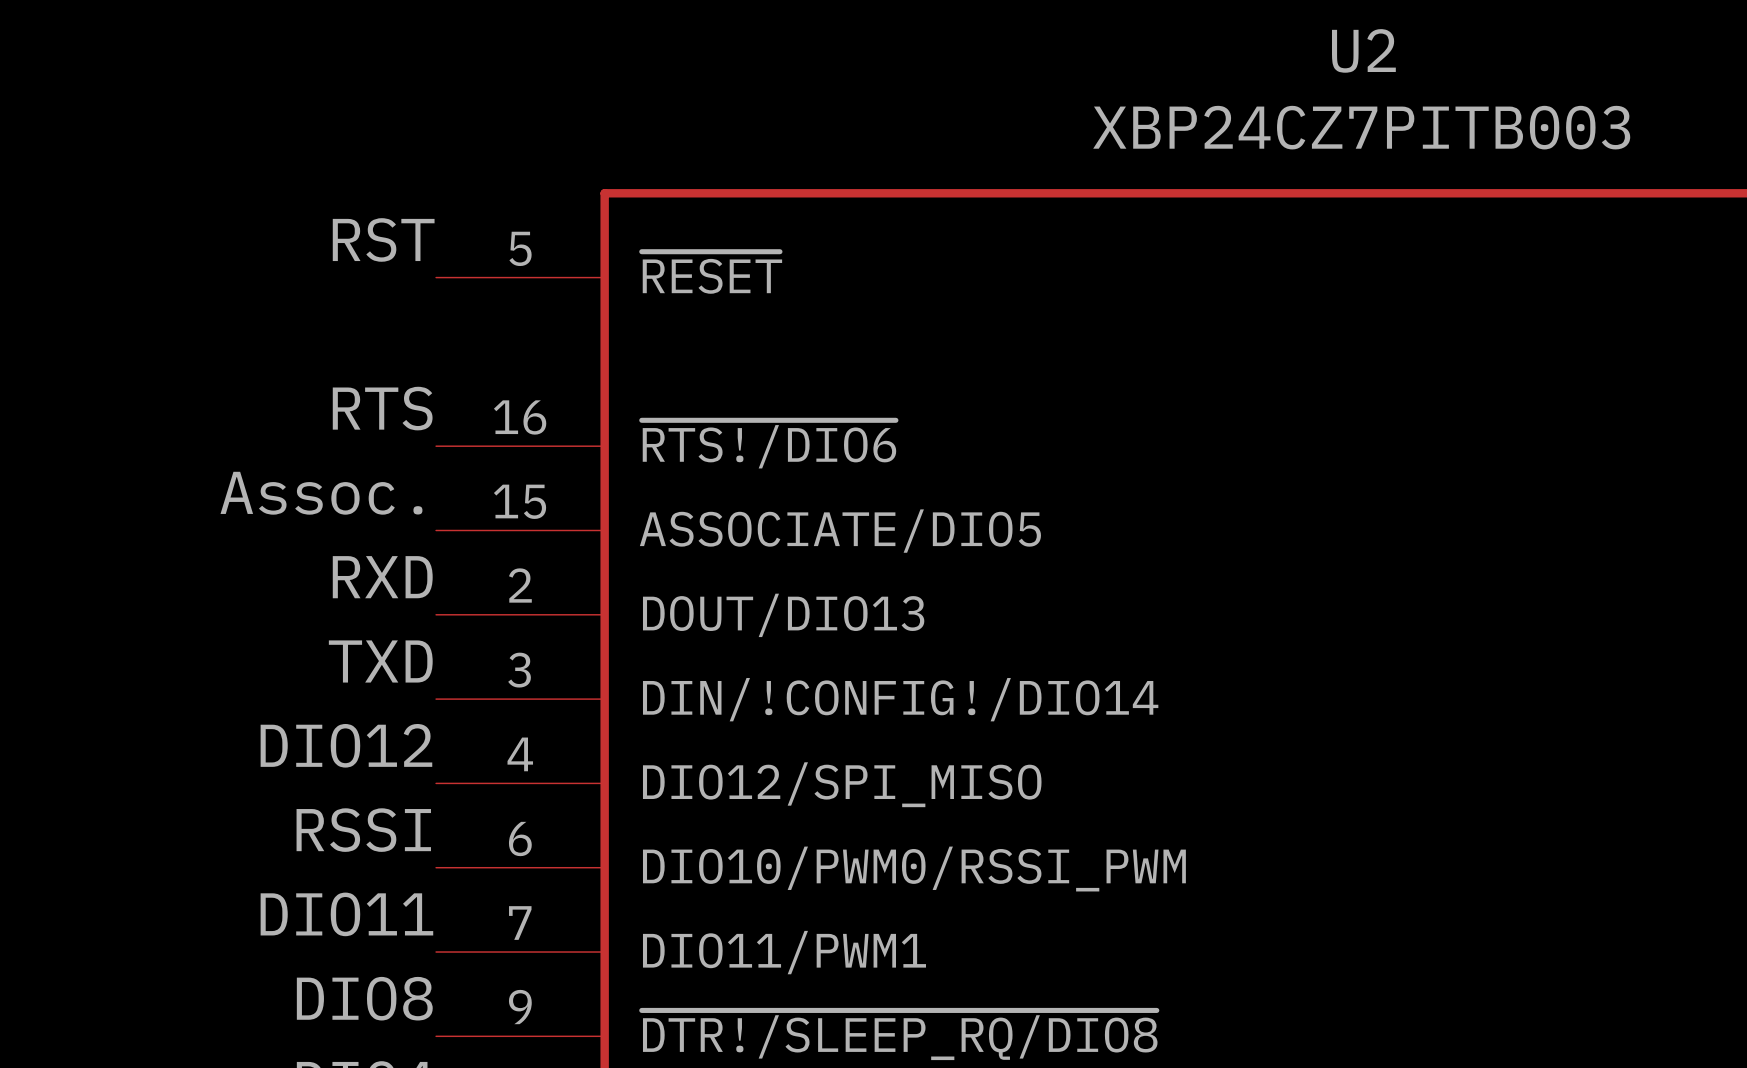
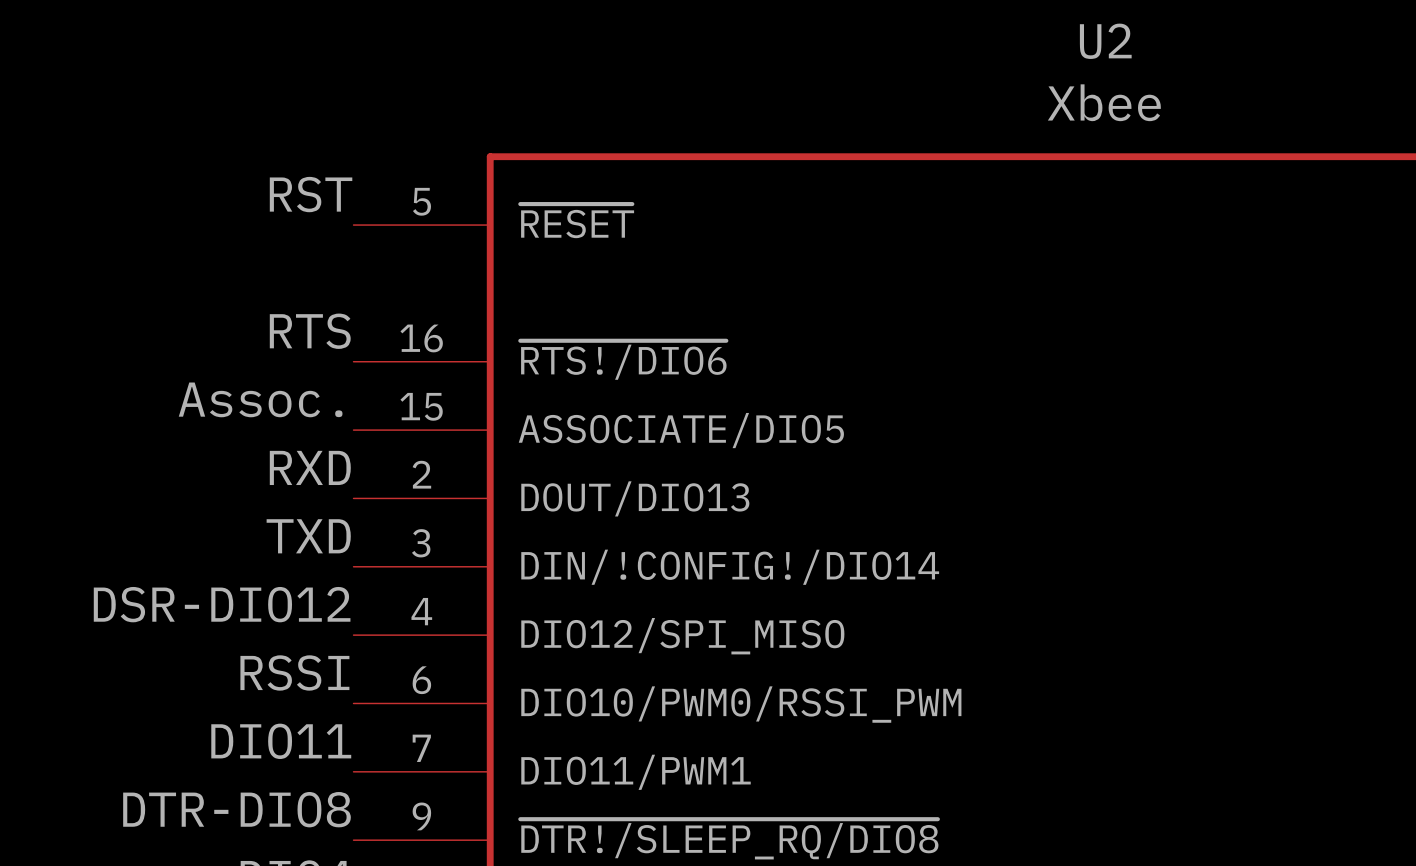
U2 value: XBP24CZ7PITB003 (1361, 127) -> Xbee (1104, 102)
label: DIO12 (346, 745) -> DSR-DIO12 (222, 604)
label: DIO8 (364, 998) -> DTR-DIO8 (236, 809)

